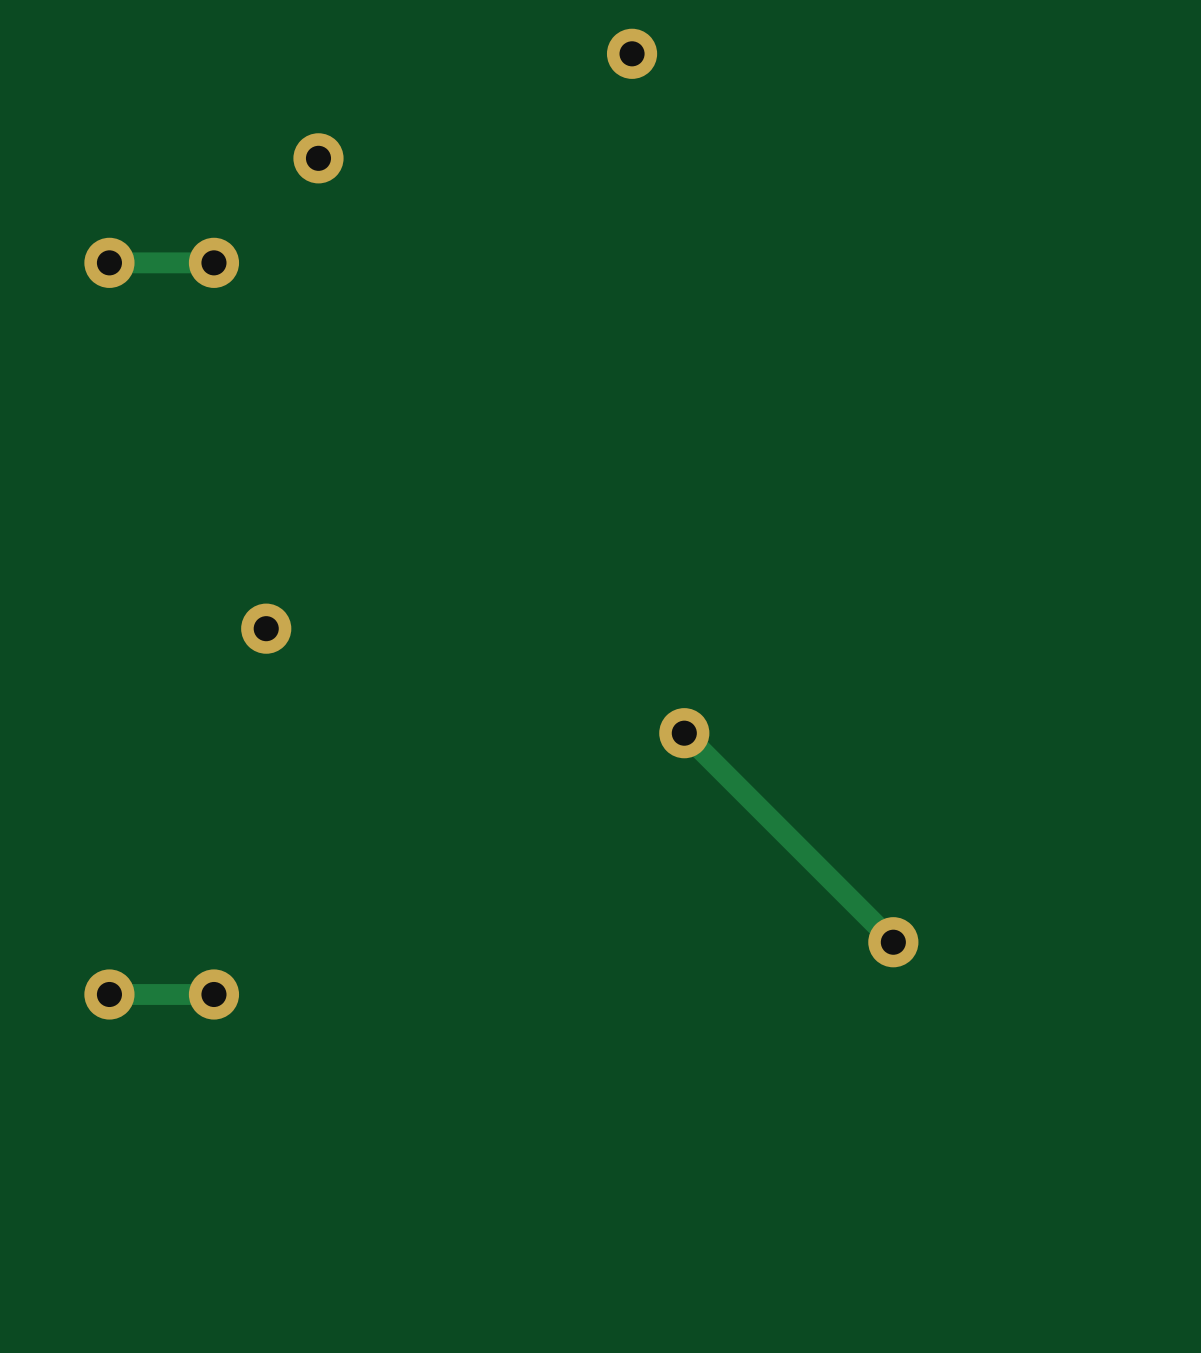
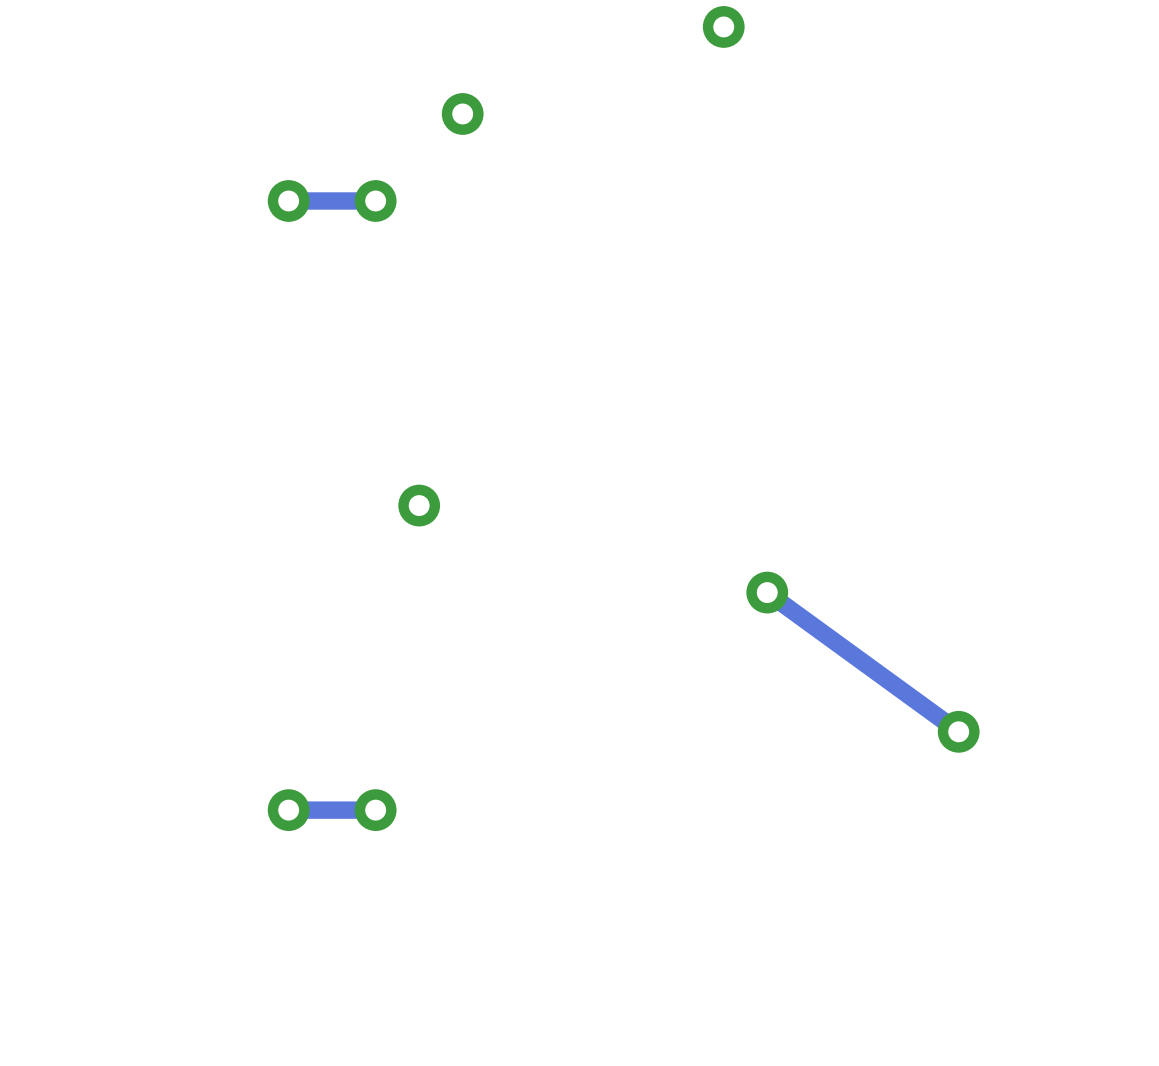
track: (684, 733) (893, 942) -> (767, 592) (958, 731)
via position: (893, 942) -> (958, 731)

